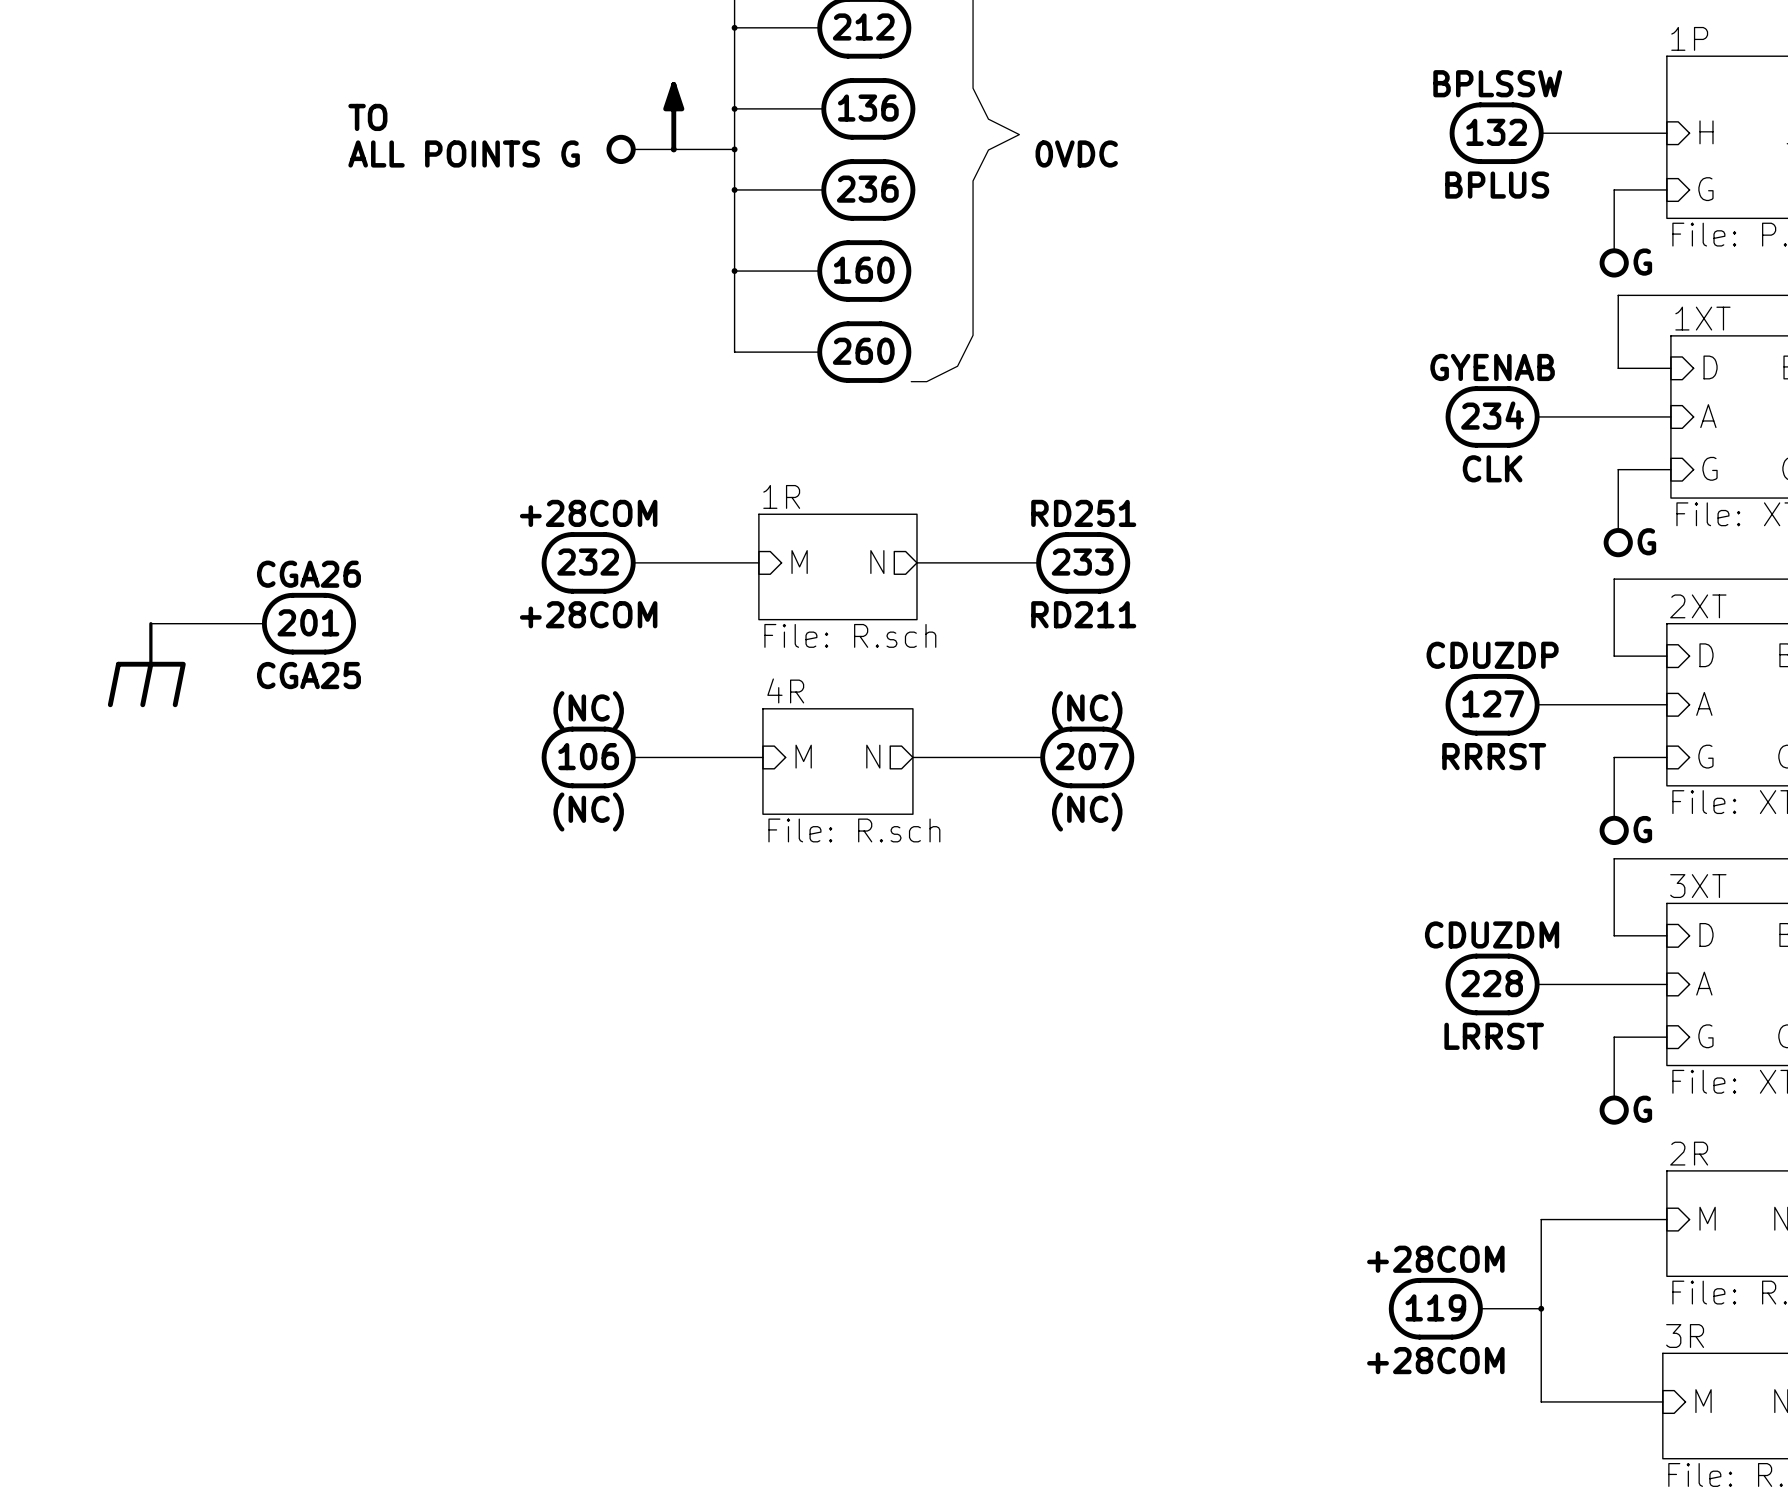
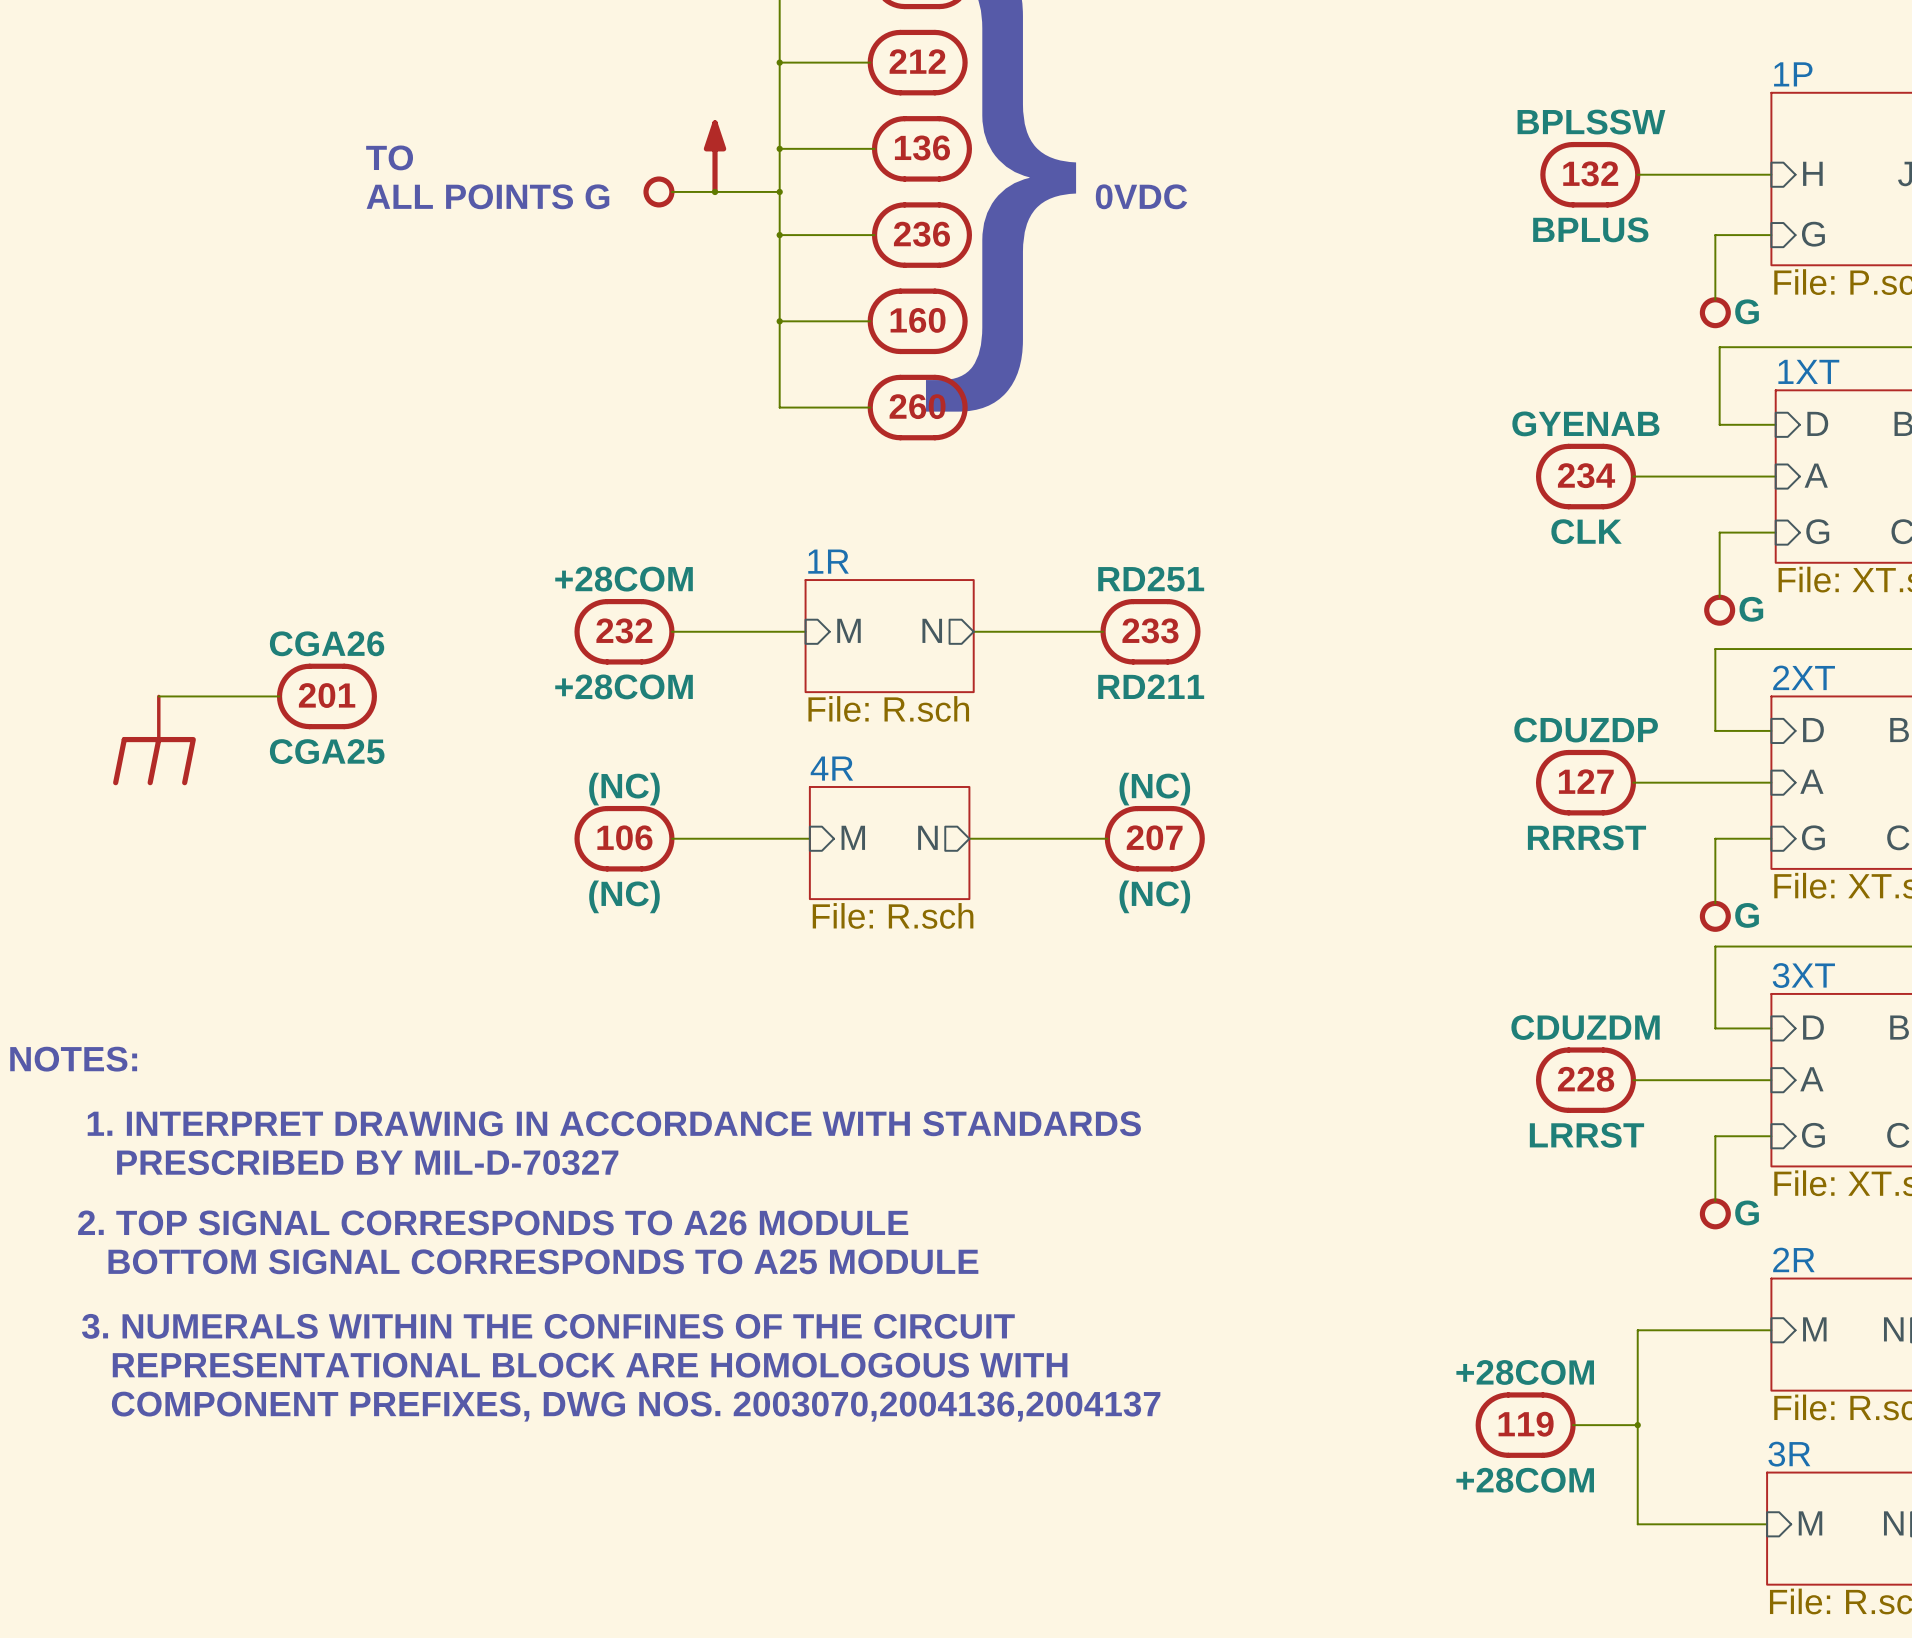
text: none -> NOTES: (73, 1059)
text: none -> 1. INTERPRET DRAWING IN ACCORDANCE WITH STANDARDS (614, 1123)
text: none -> PRESCRIBED BY MIL-D-70327 (367, 1162)
text: none -> 2. TOP SIGNAL CORRESPONDS TO A26 MODULE (493, 1222)
text: none -> BOTTOM SIGNAL CORRESPONDS TO A25 MODULE (543, 1261)
text: none -> 3. NUMERALS WITHIN THE CONFINES OF THE CIRCUIT (548, 1326)
text: none -> REPRESENTATIONAL BLOCK ARE HOMOLOGOUS WITH (590, 1365)
text: none -> COMPONENT PREFIXES, DWG NOS. 2003070,2004136,2004137 (636, 1406)

